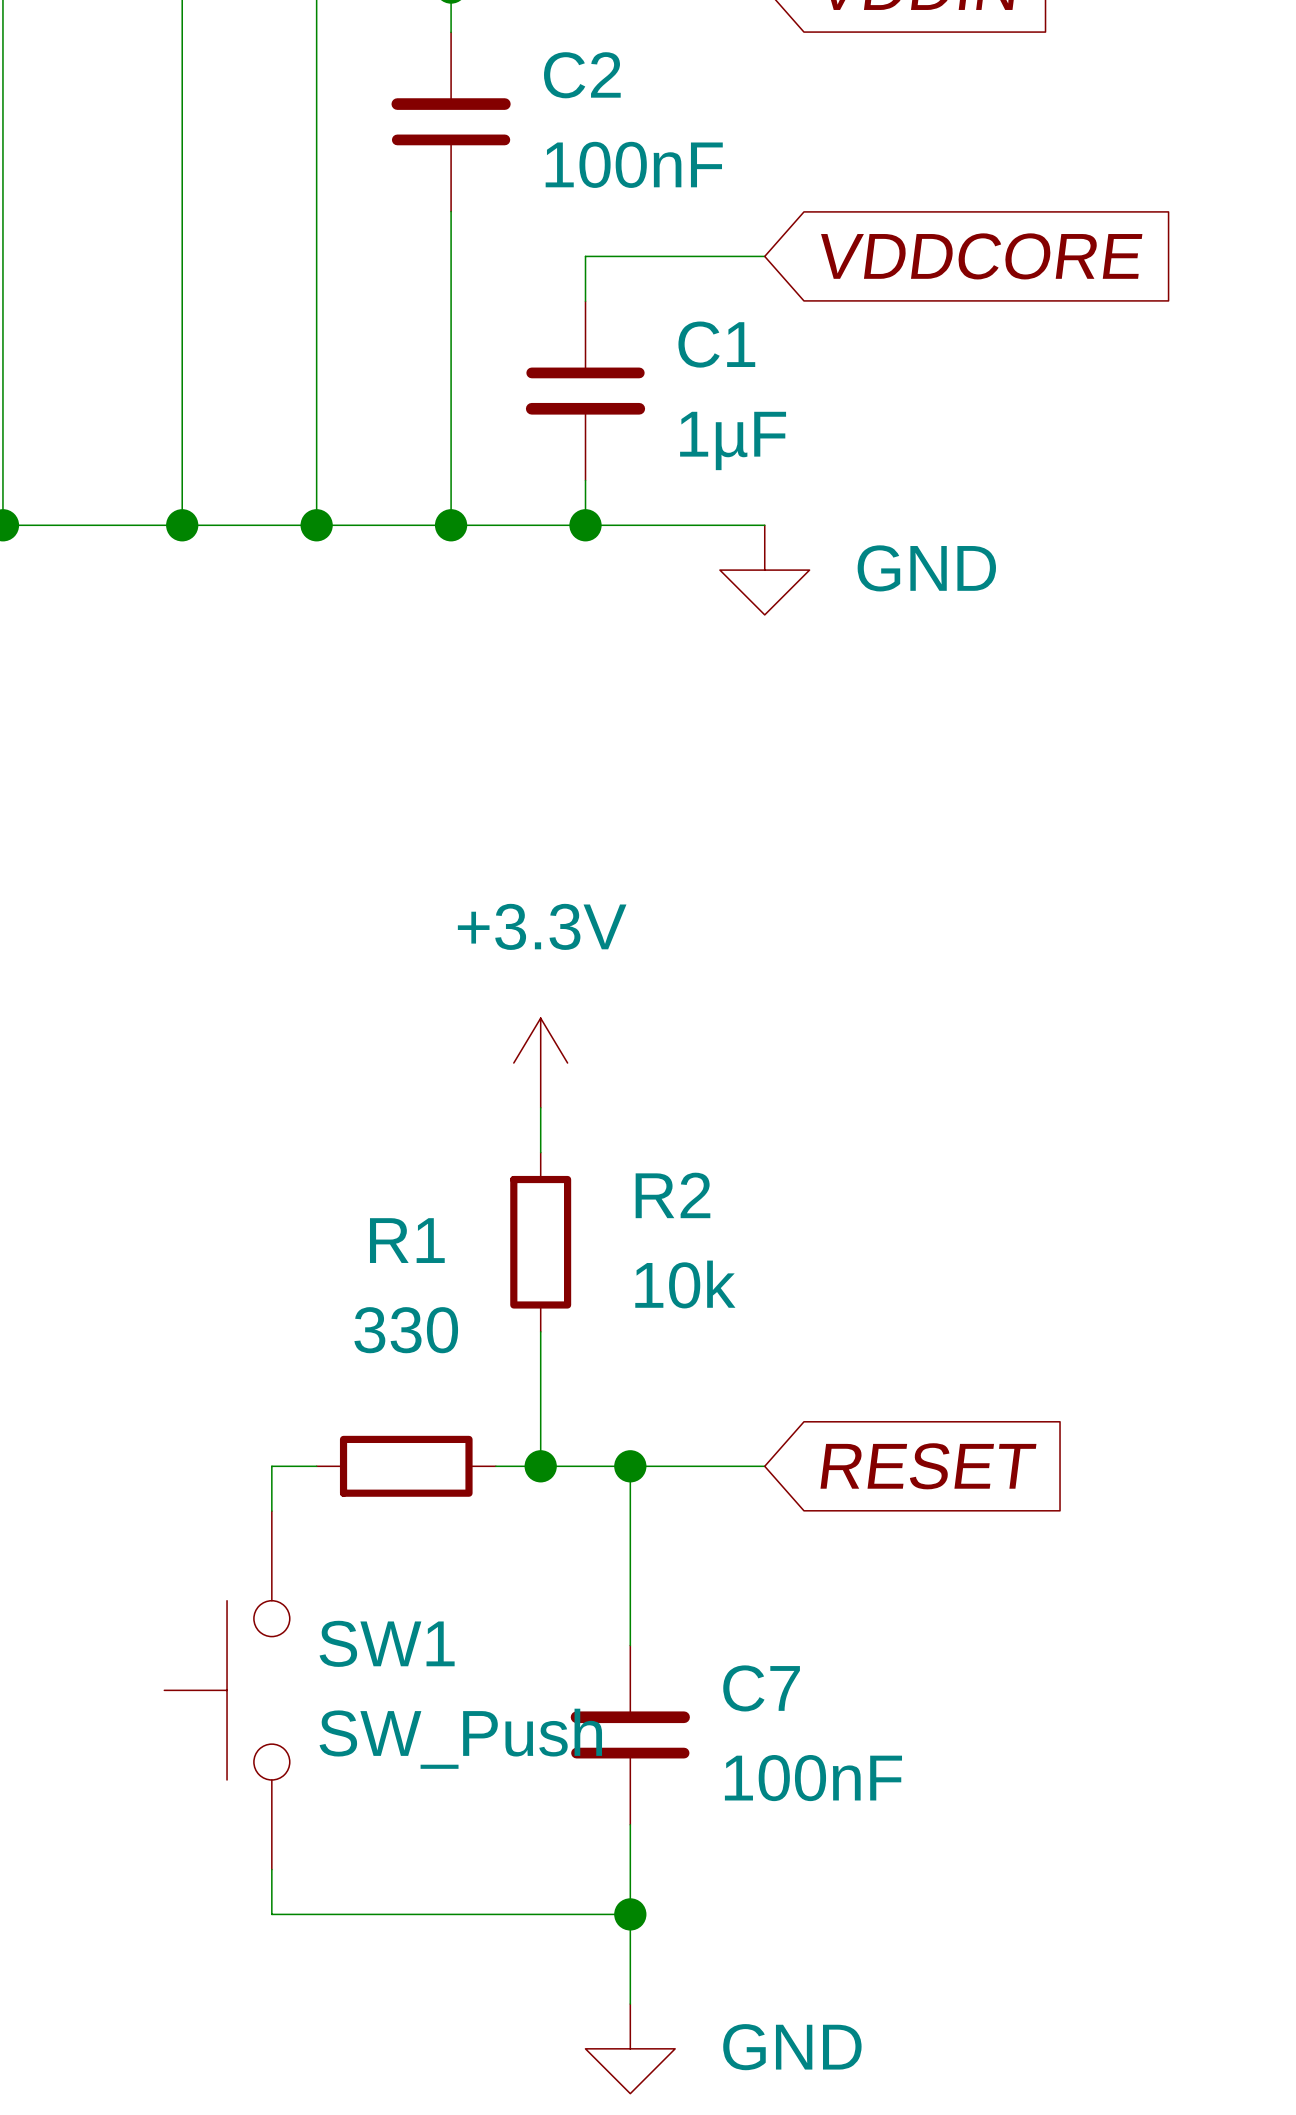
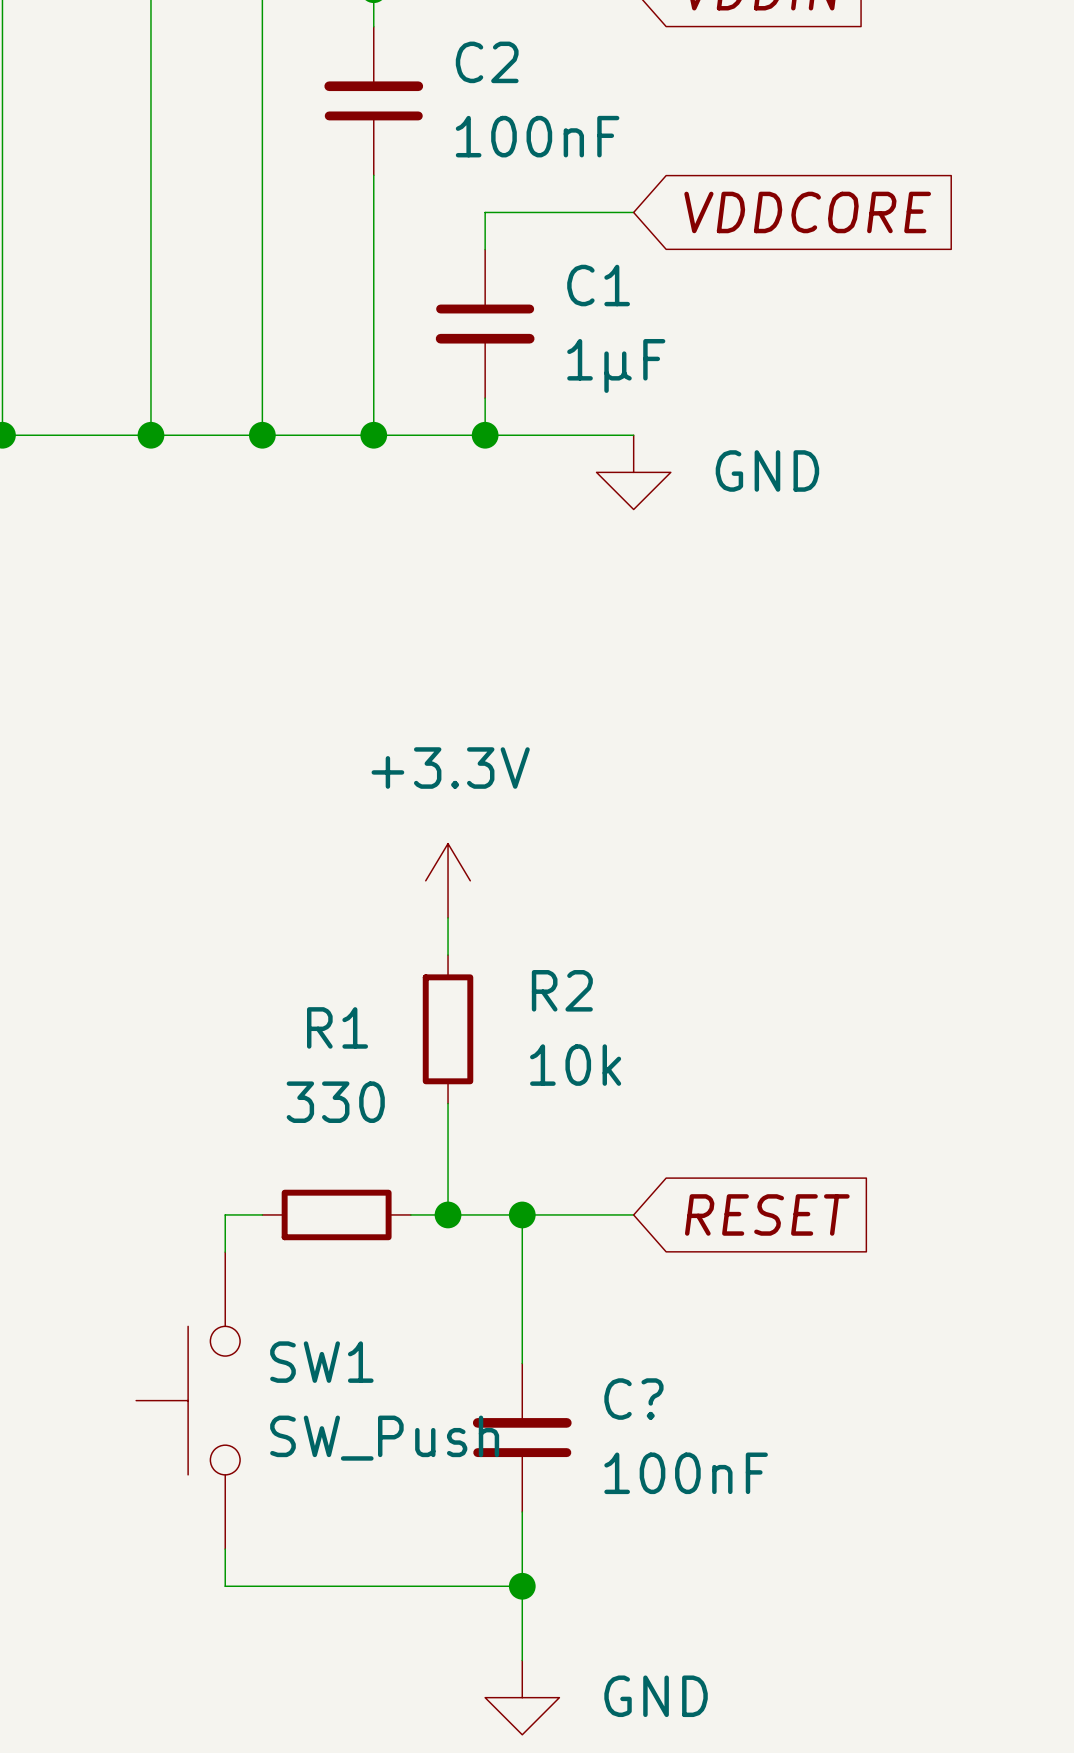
C7 name: C7 (761, 1688) -> C? (633, 1399)

